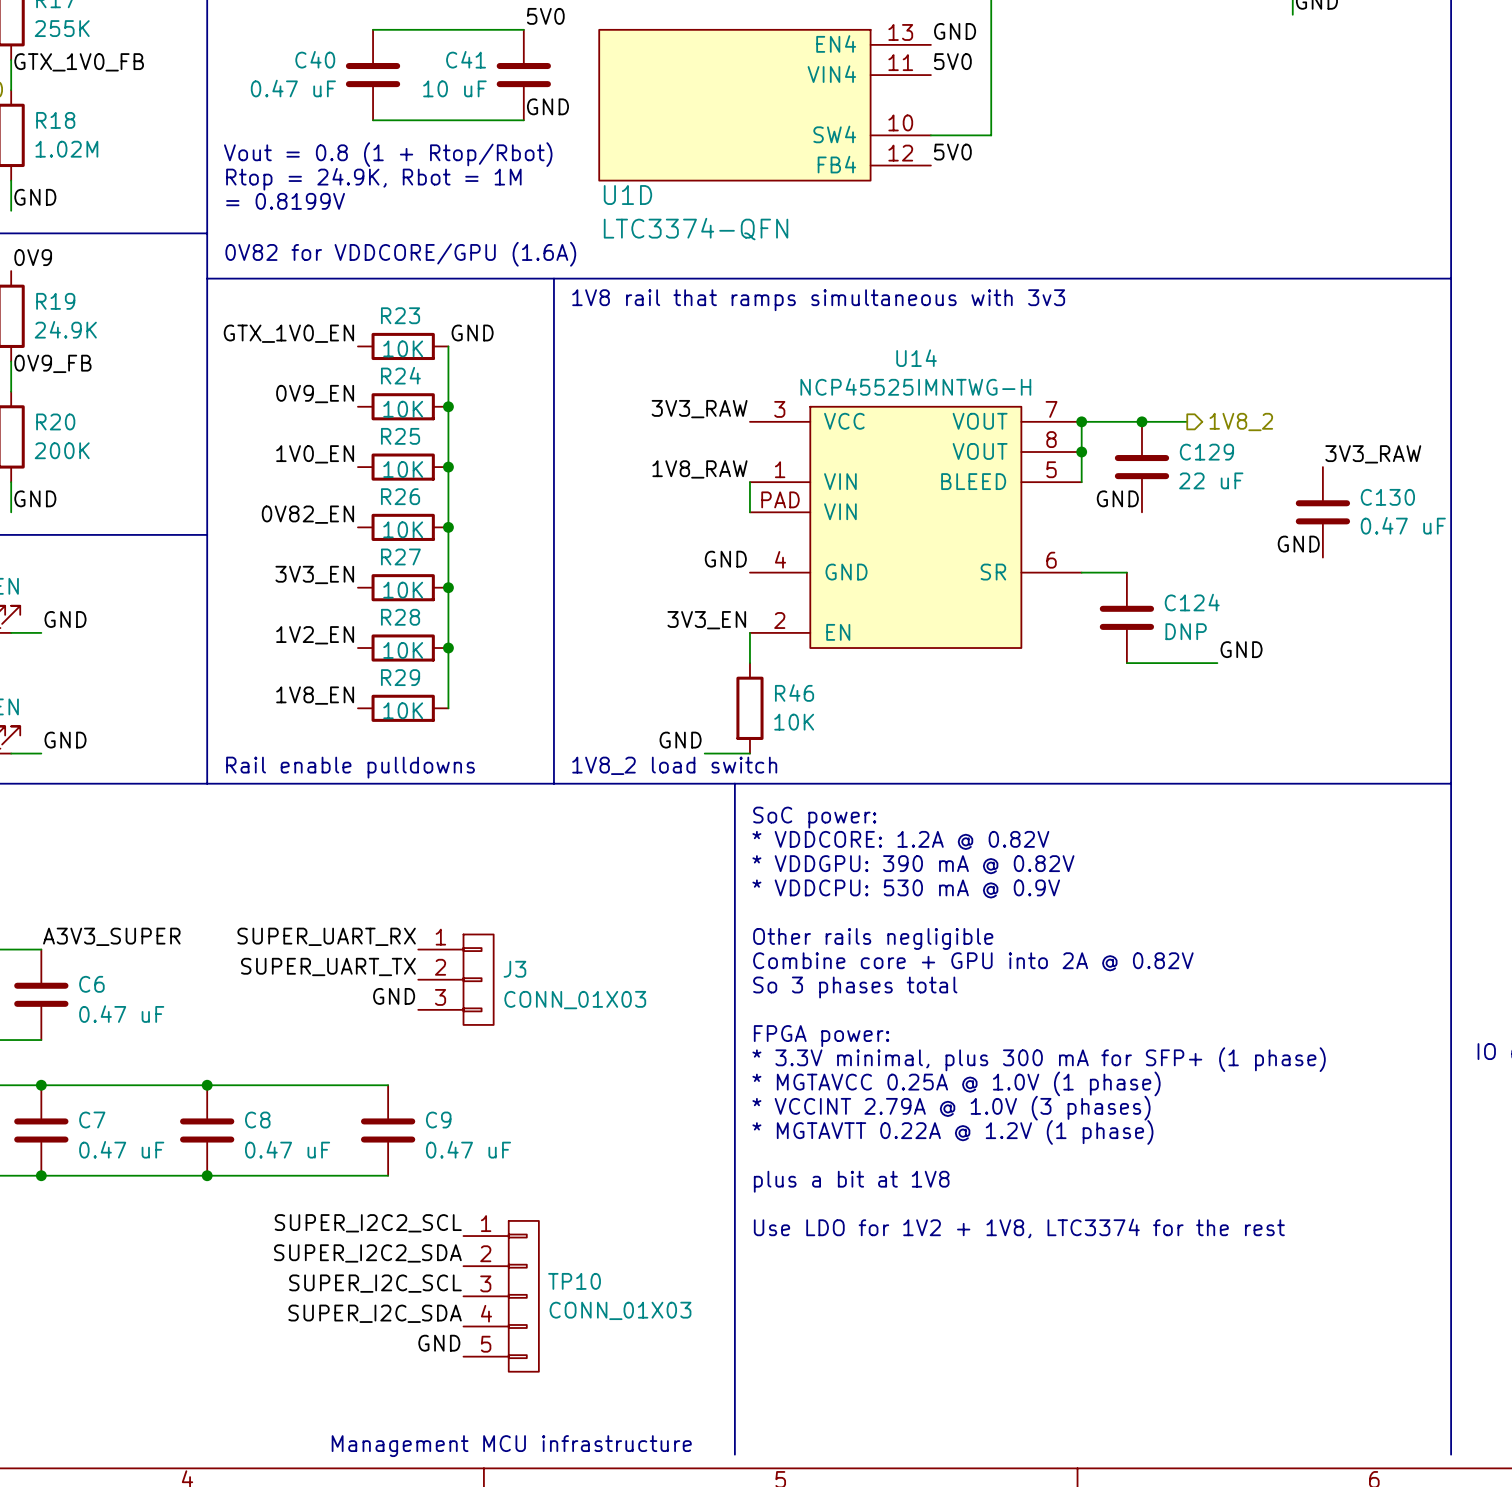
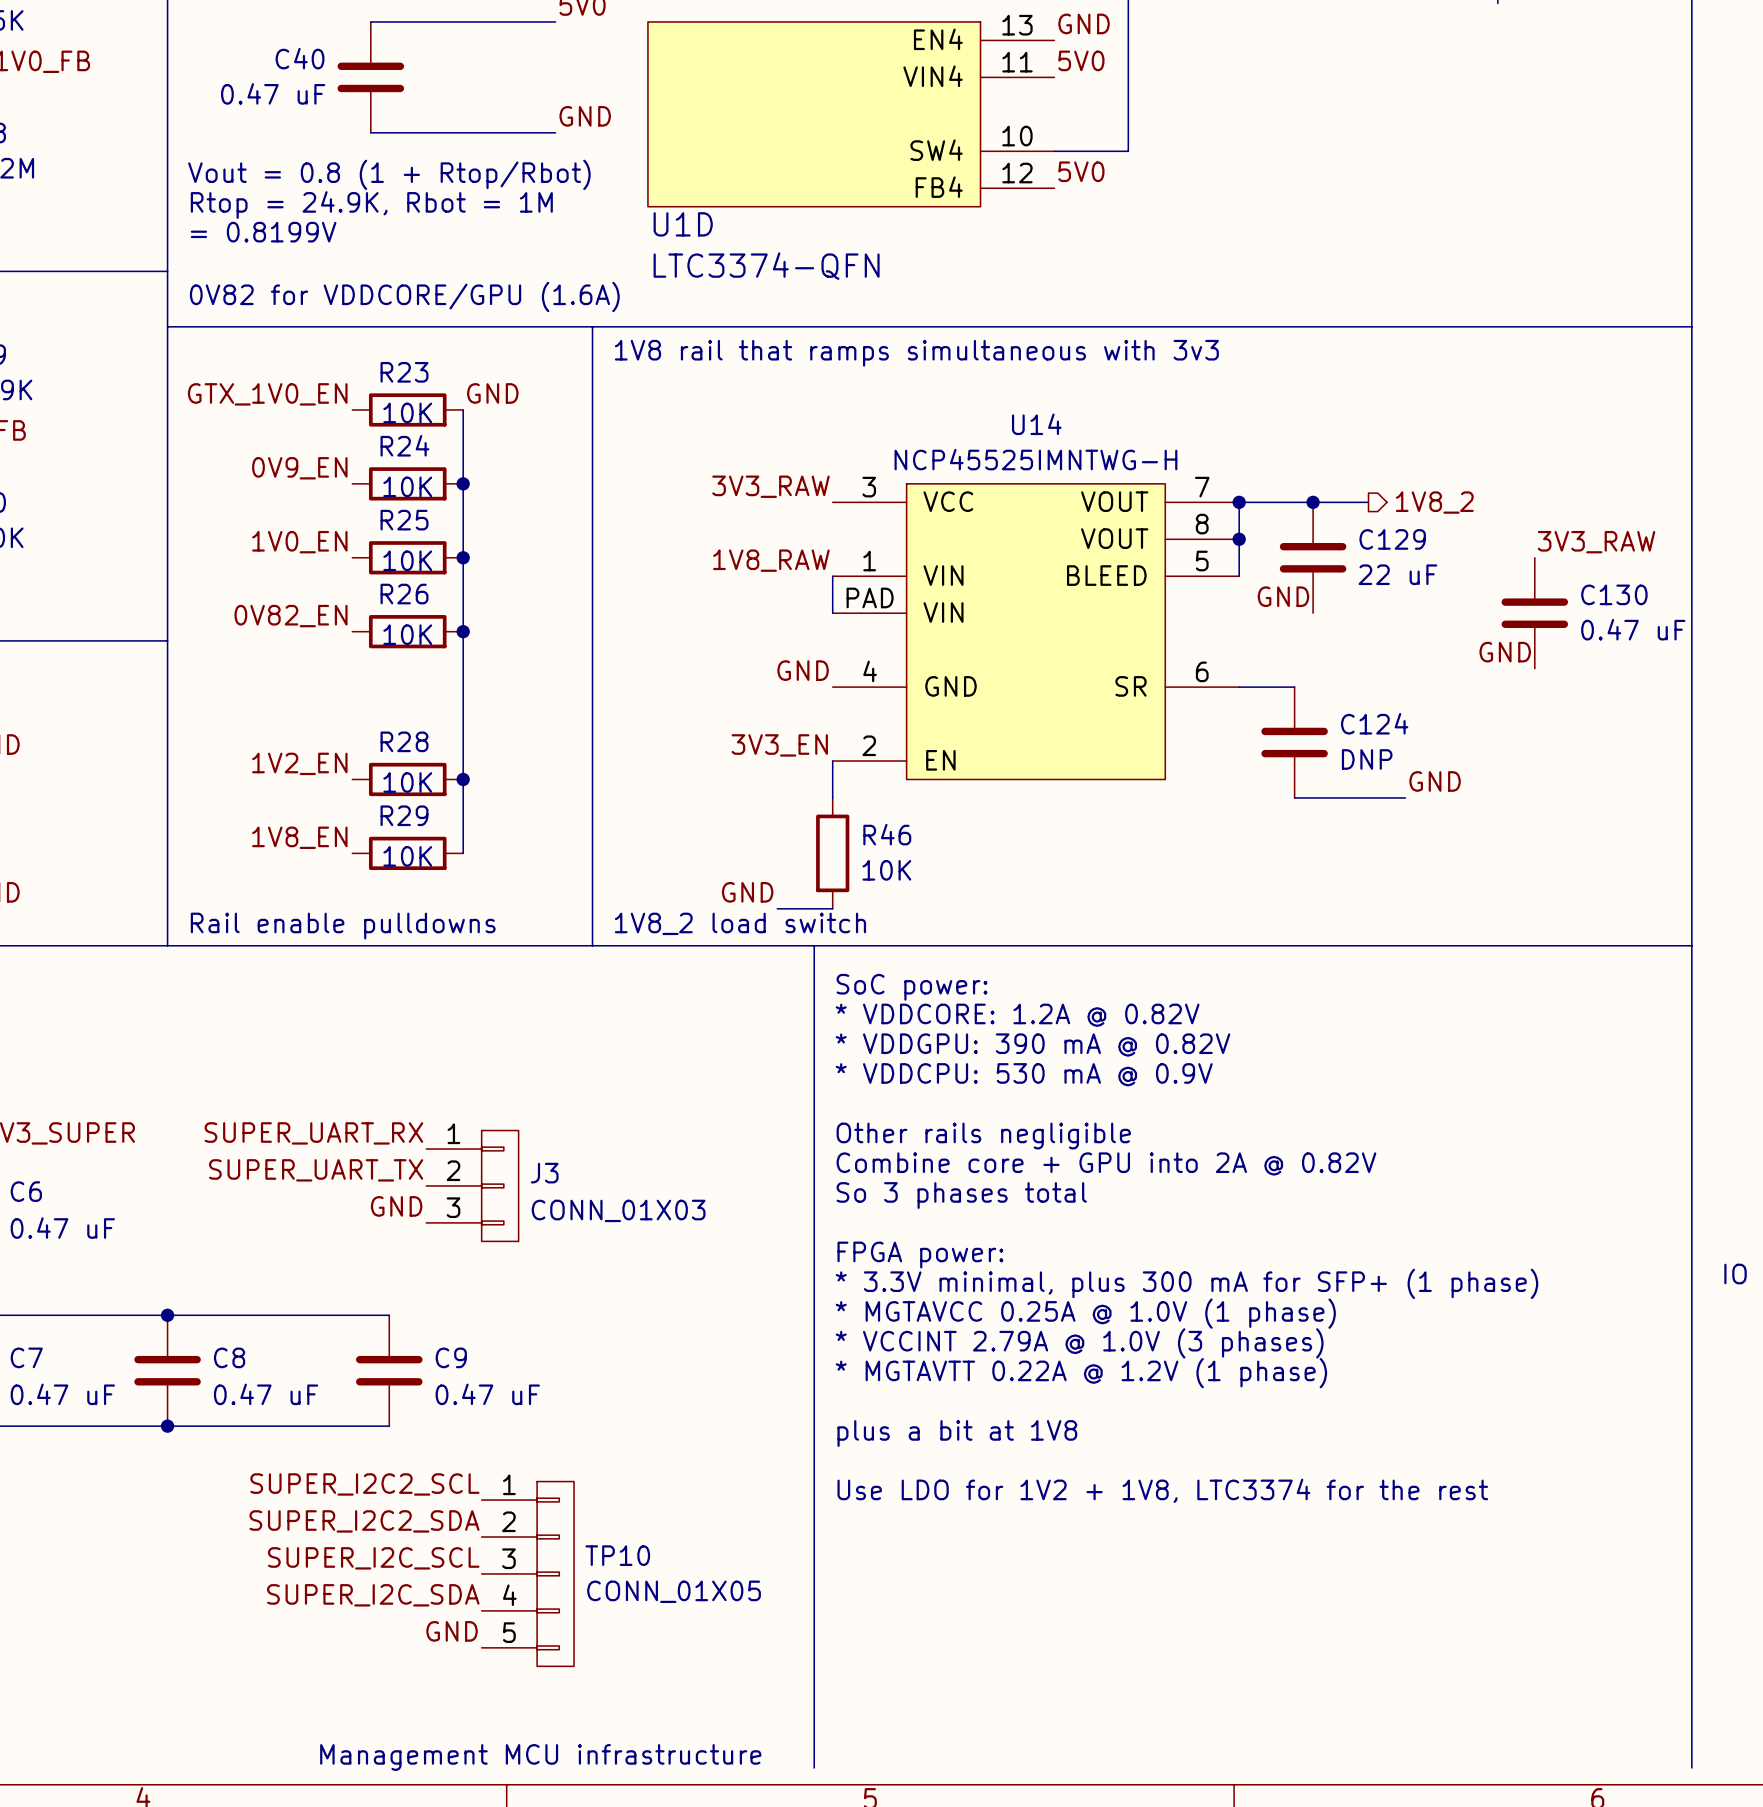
C41: 10 uF (523, 75) -> none
label: 3V3_EN (314, 574) -> none
R27: 10K (403, 587) -> none
junction: (448, 587) -> none
TP10 value: CONN_01X03 (620, 1310) -> CONN_01X05 (674, 1591)

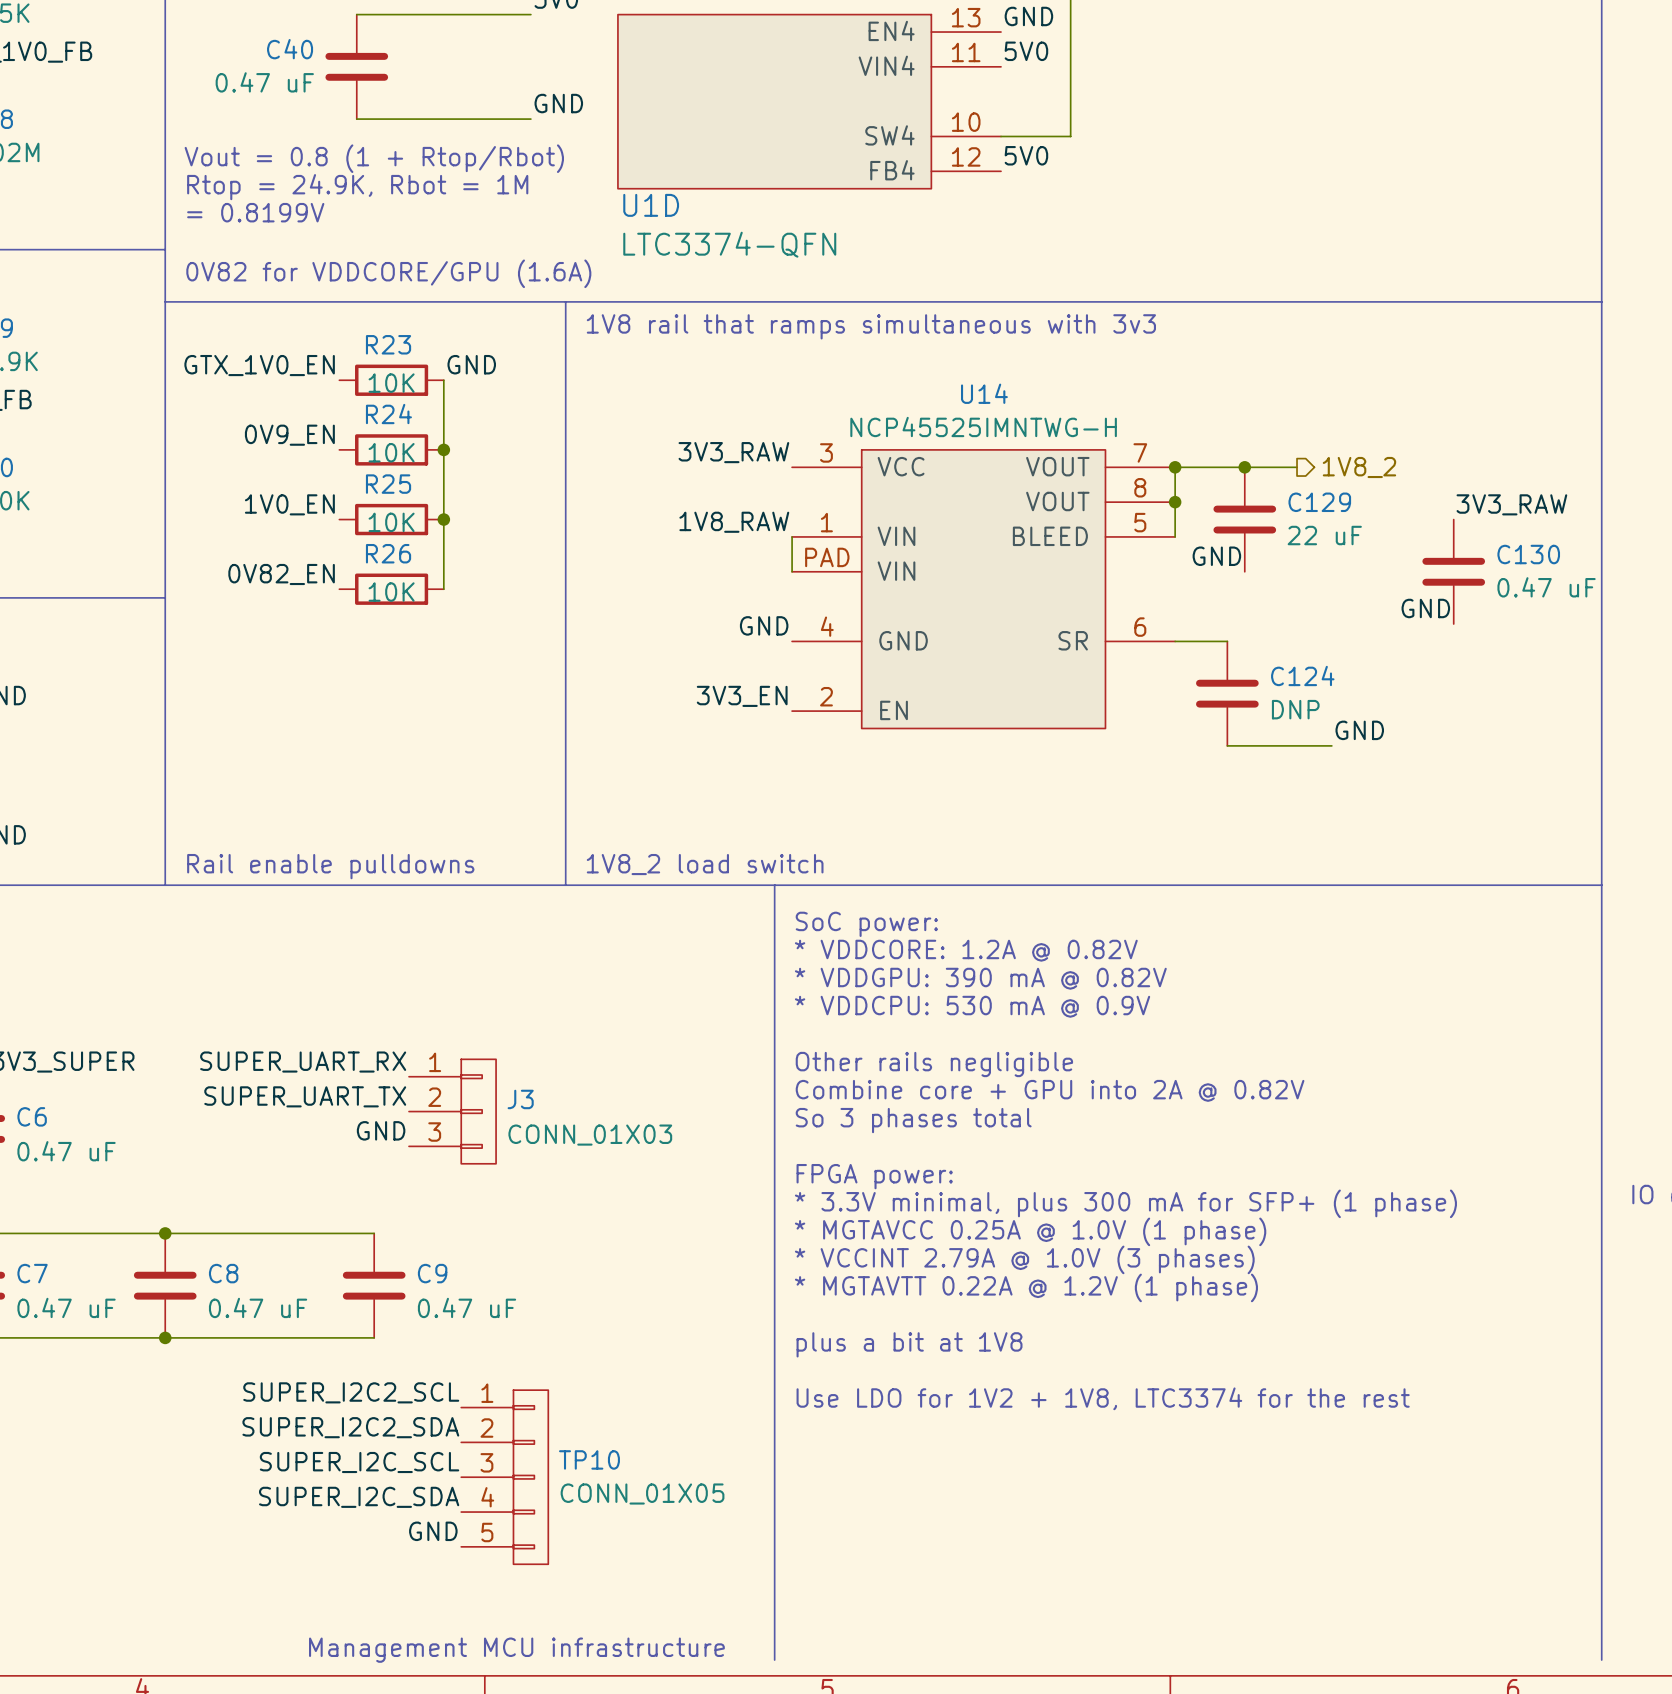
wire: (463, 631) (463, 853) -> none
junction: (463, 631) -> none
wire: (832, 761) (832, 797) -> none
label: 1V2_EN (299, 763) -> none
R28: 10K (407, 779) -> none
junction: (463, 779) -> none
label: 1V8_EN (299, 837) -> none
R29: 10K (407, 853) -> none
R46: 10K (832, 853) -> none
label: GND (747, 892) -> none
wire: (777, 908) (832, 908) -> none

